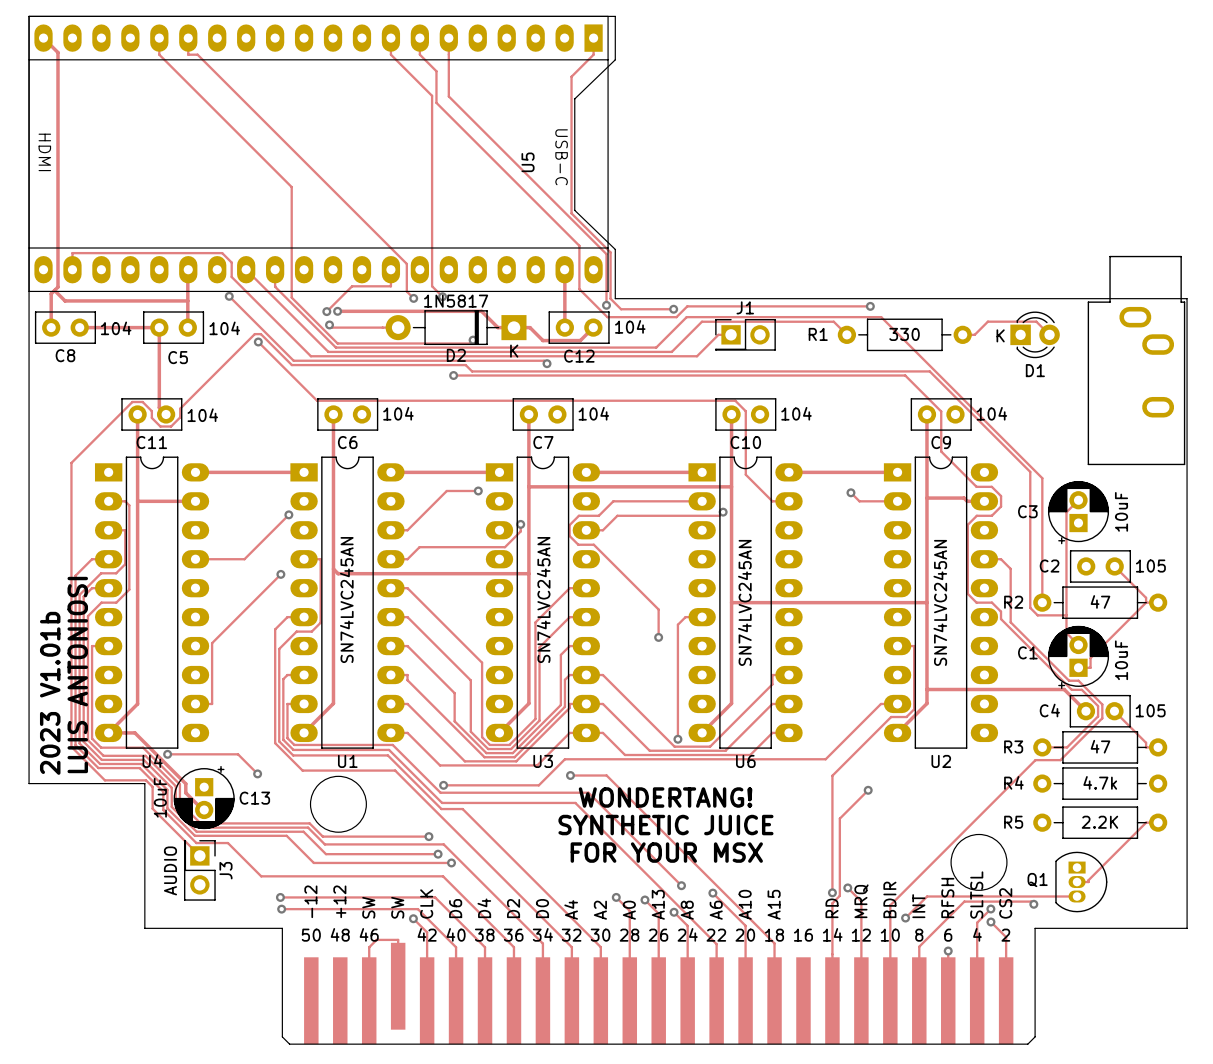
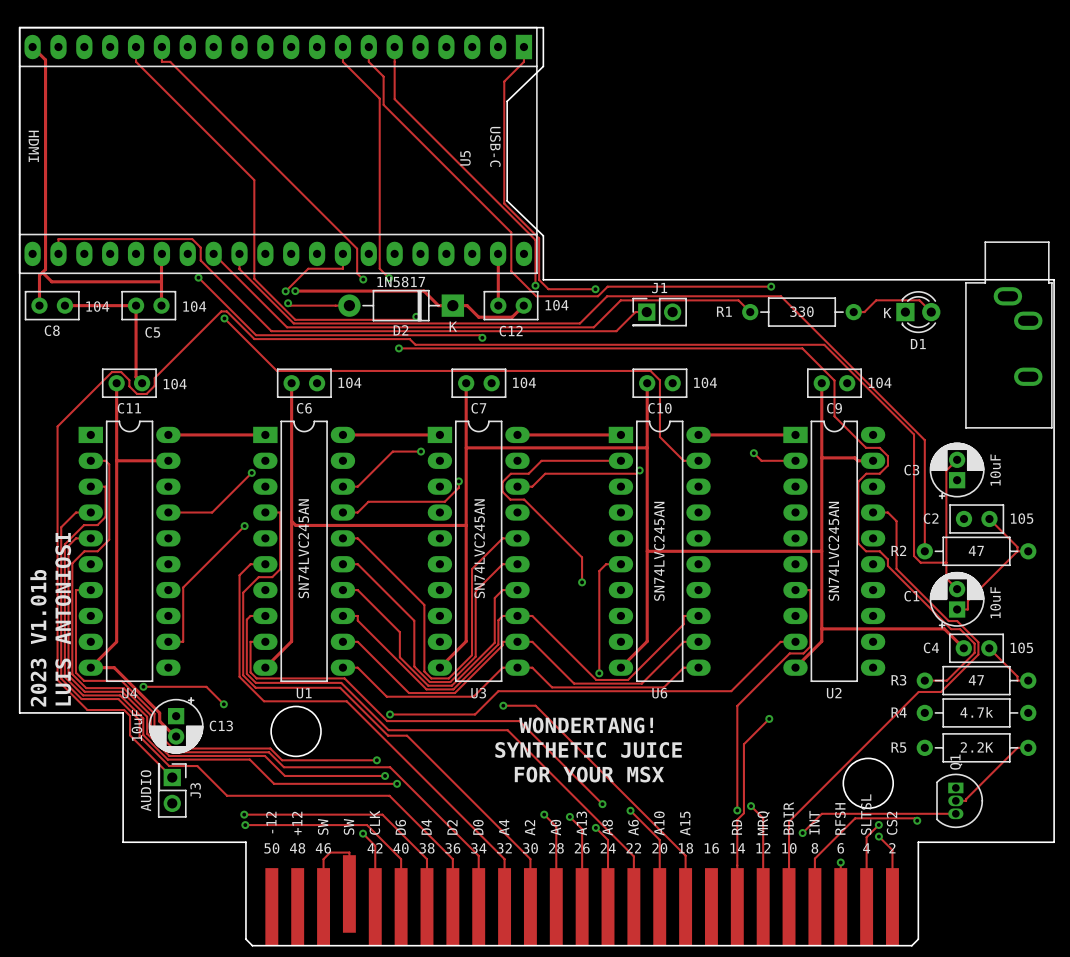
Q1 name rotation: 0° (1037, 880) -> 90° counterclockwise (956, 762)
Q1 name position: Q1 (1037, 880) -> Q1 (956, 762)

